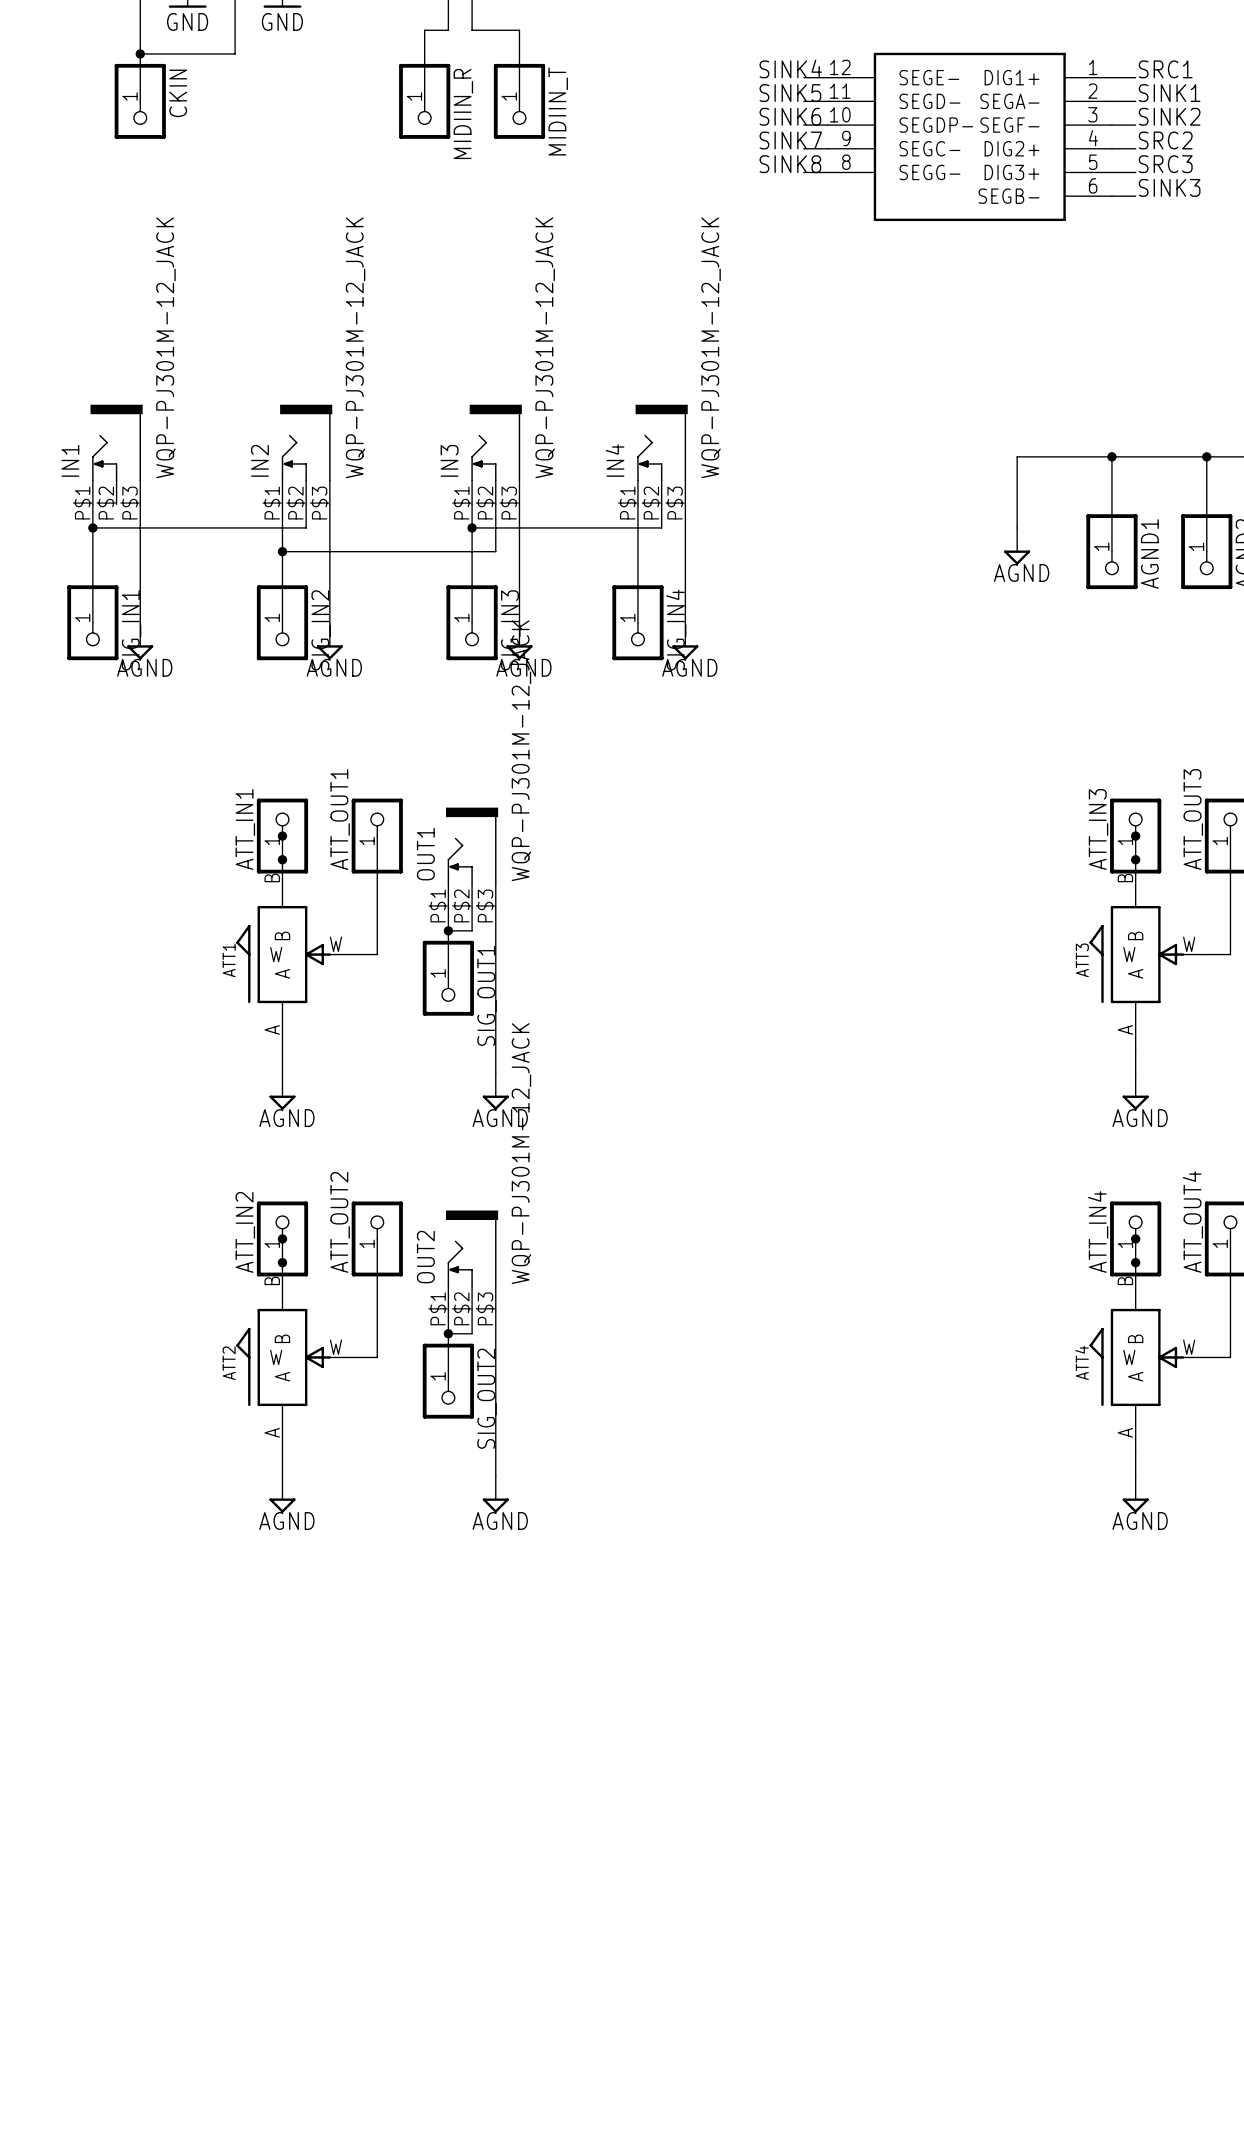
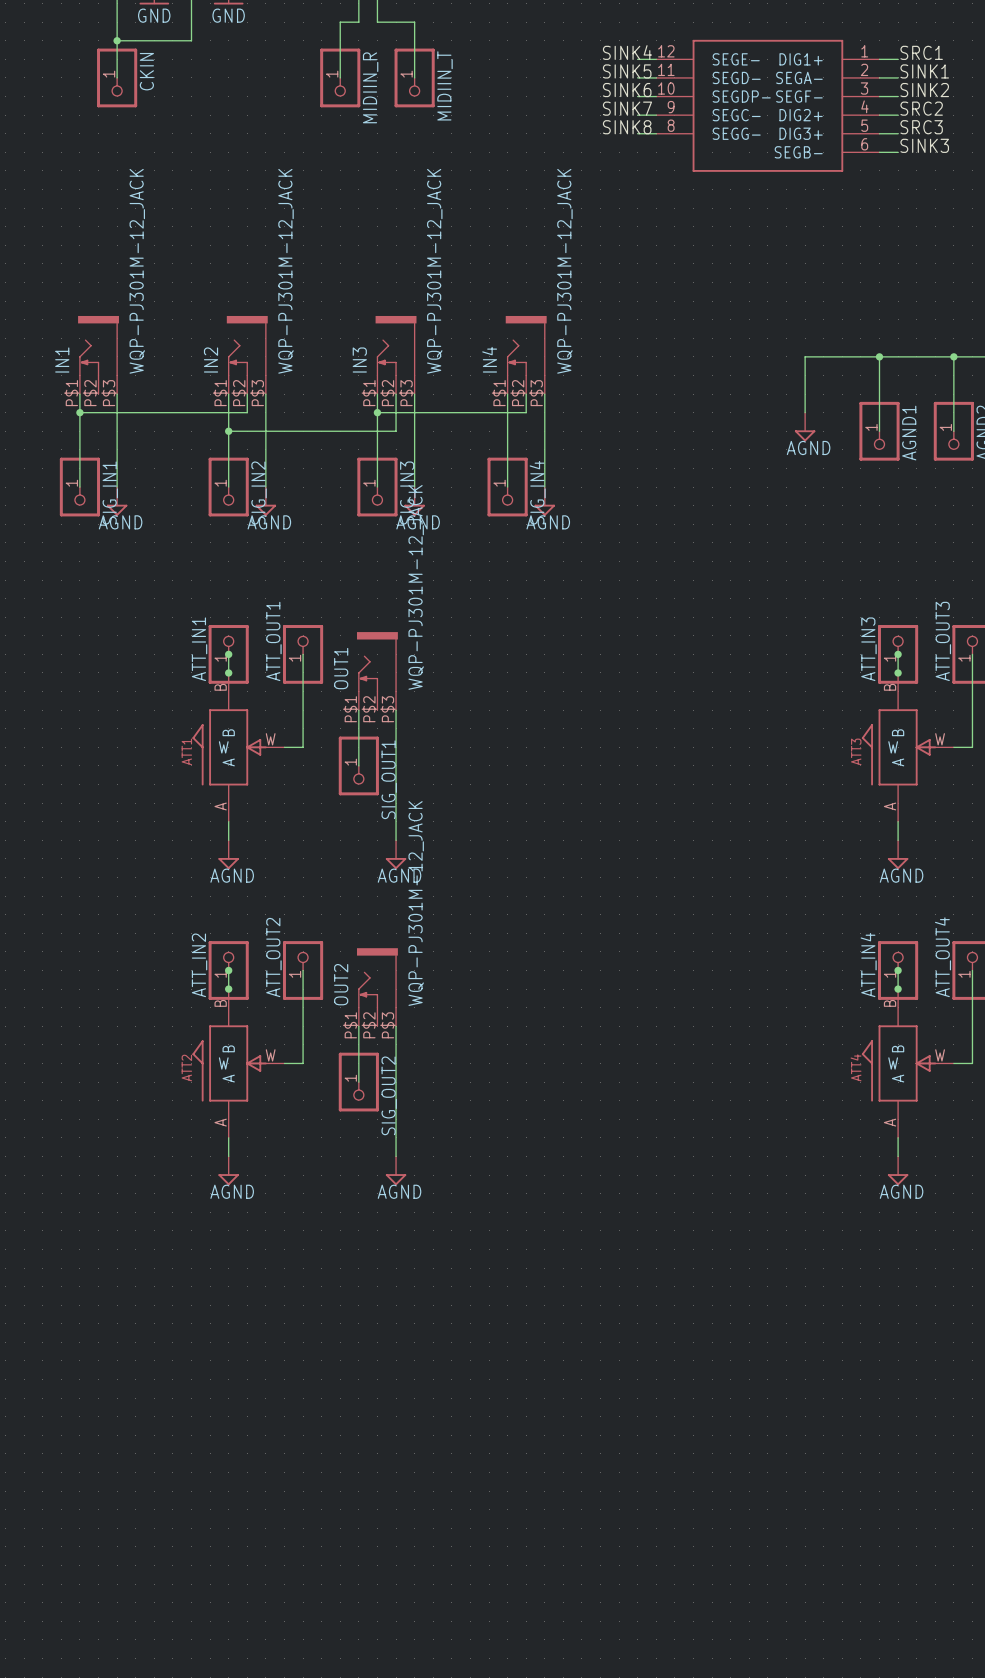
wire: (472, 907) (472, 930) (448, 930) -> none
junction: (448, 930) -> none
wire: (472, 1310) (472, 1333) (448, 1333) -> none
junction: (448, 1333) -> none

